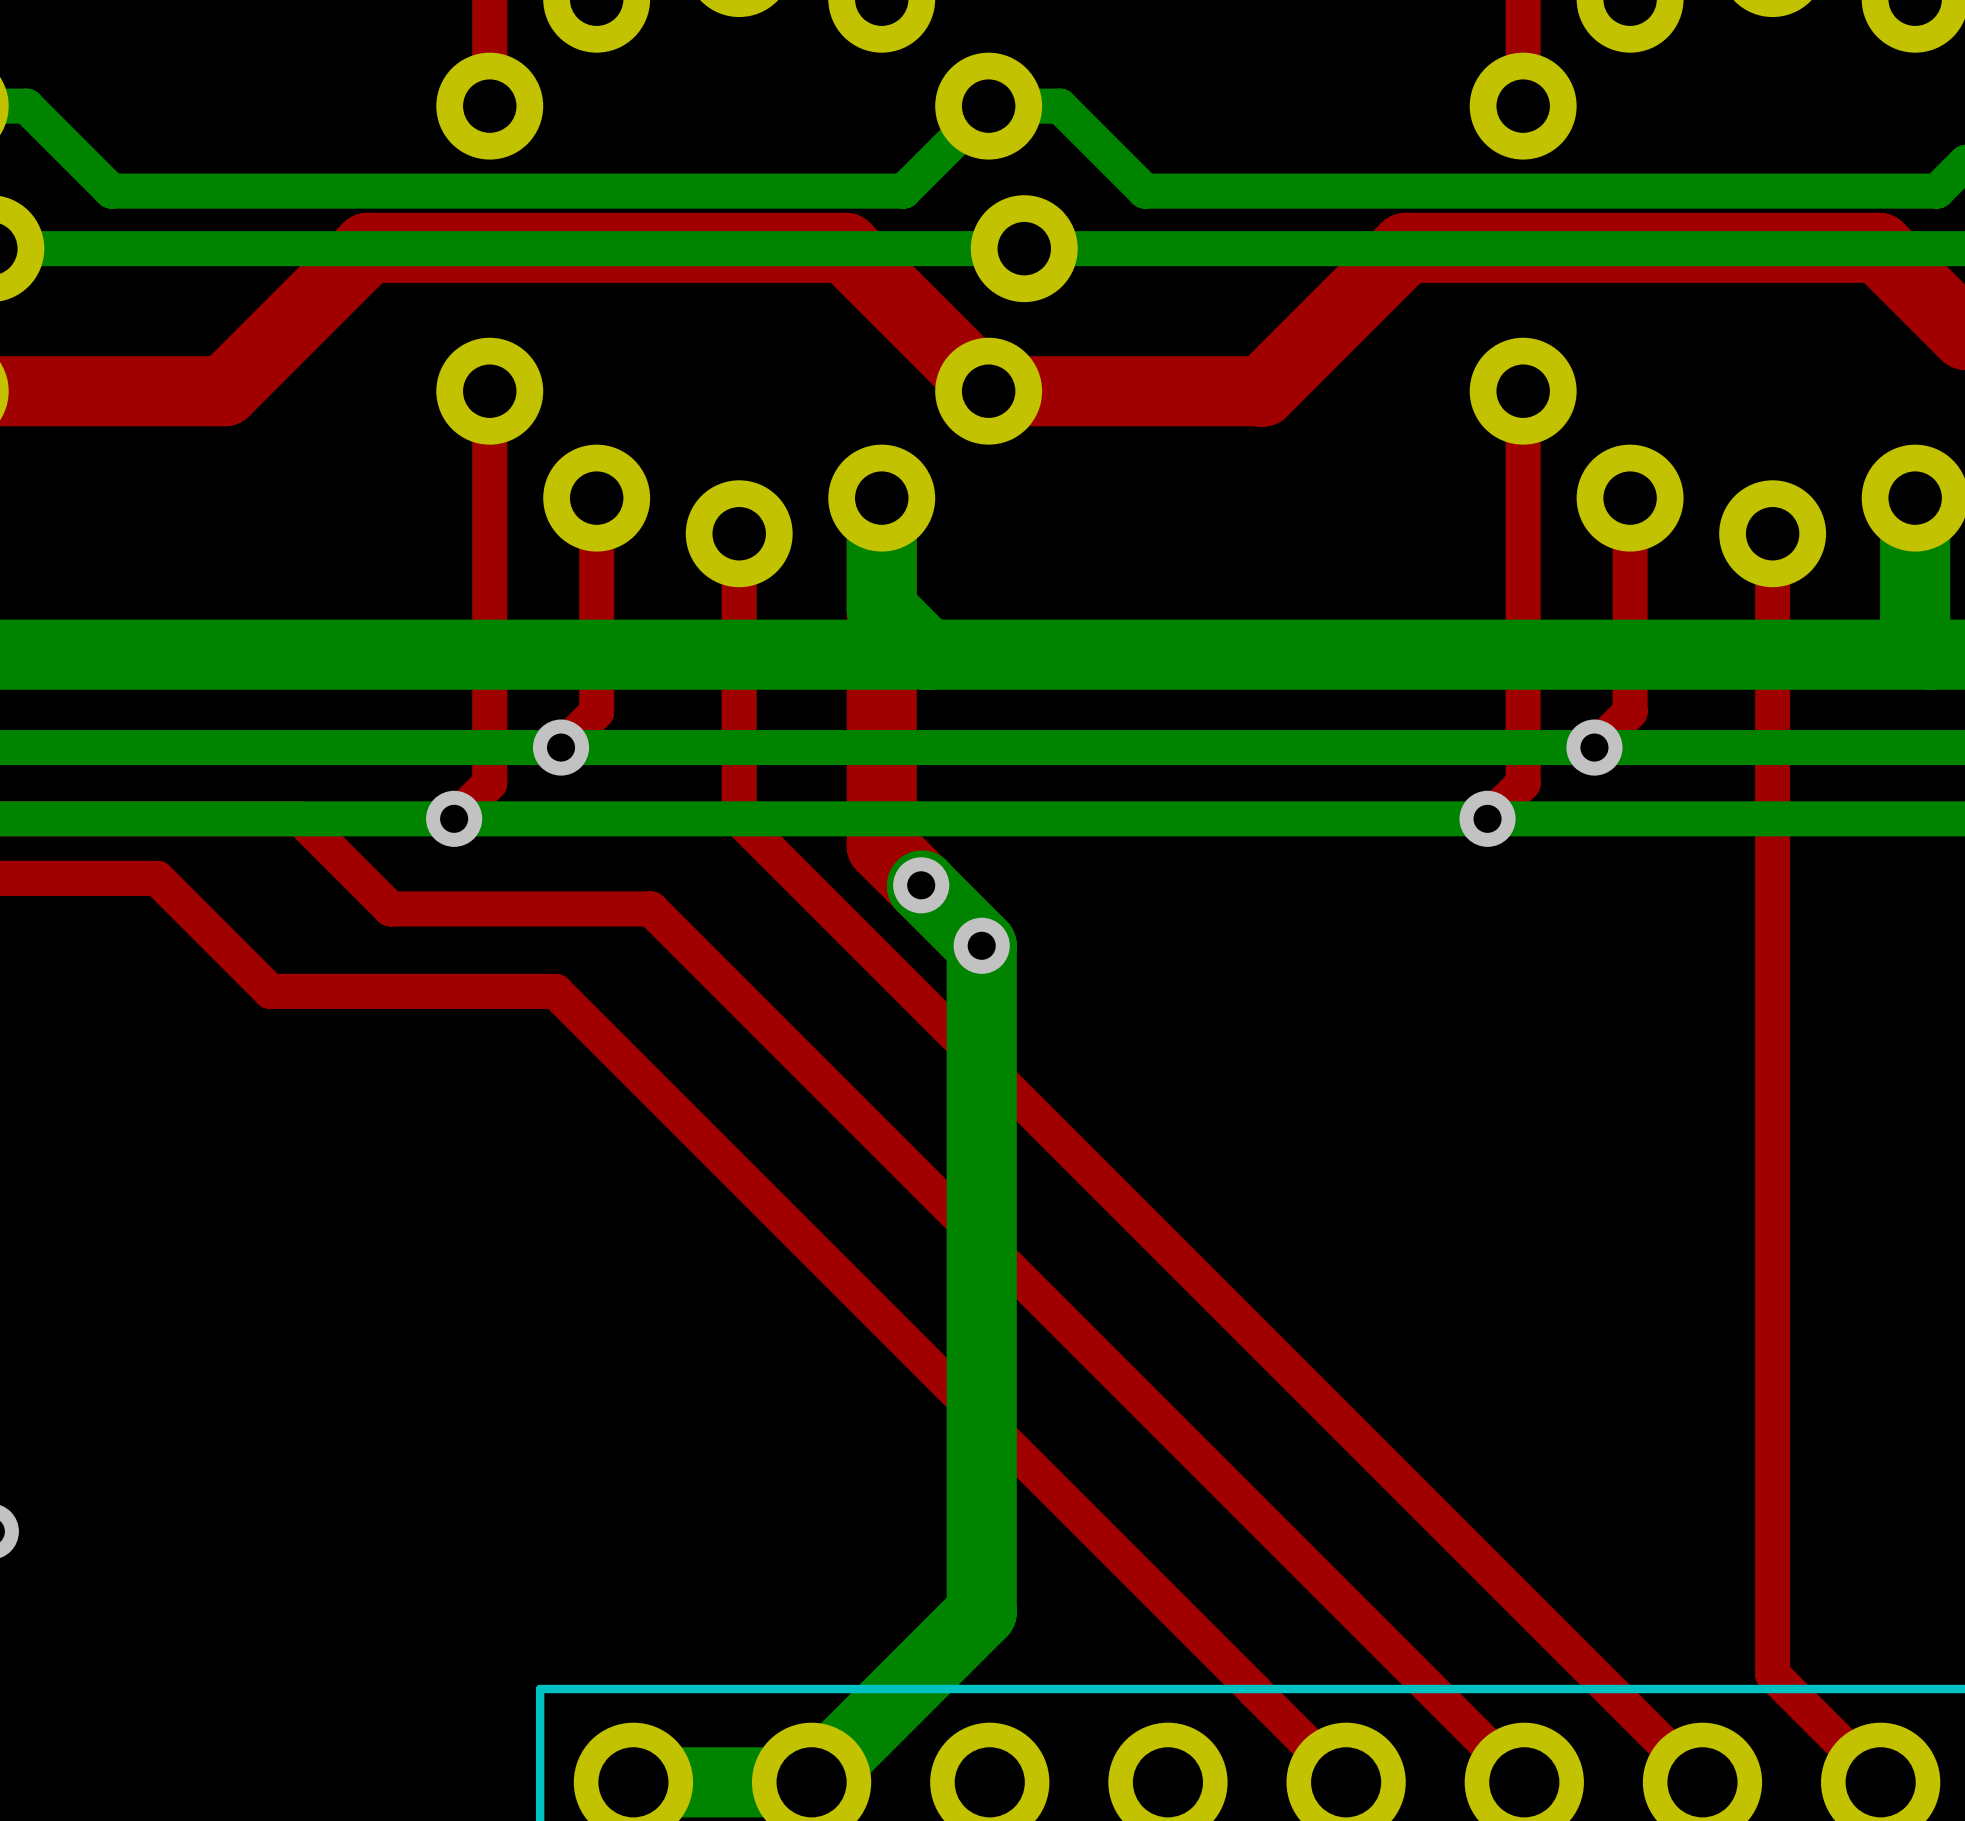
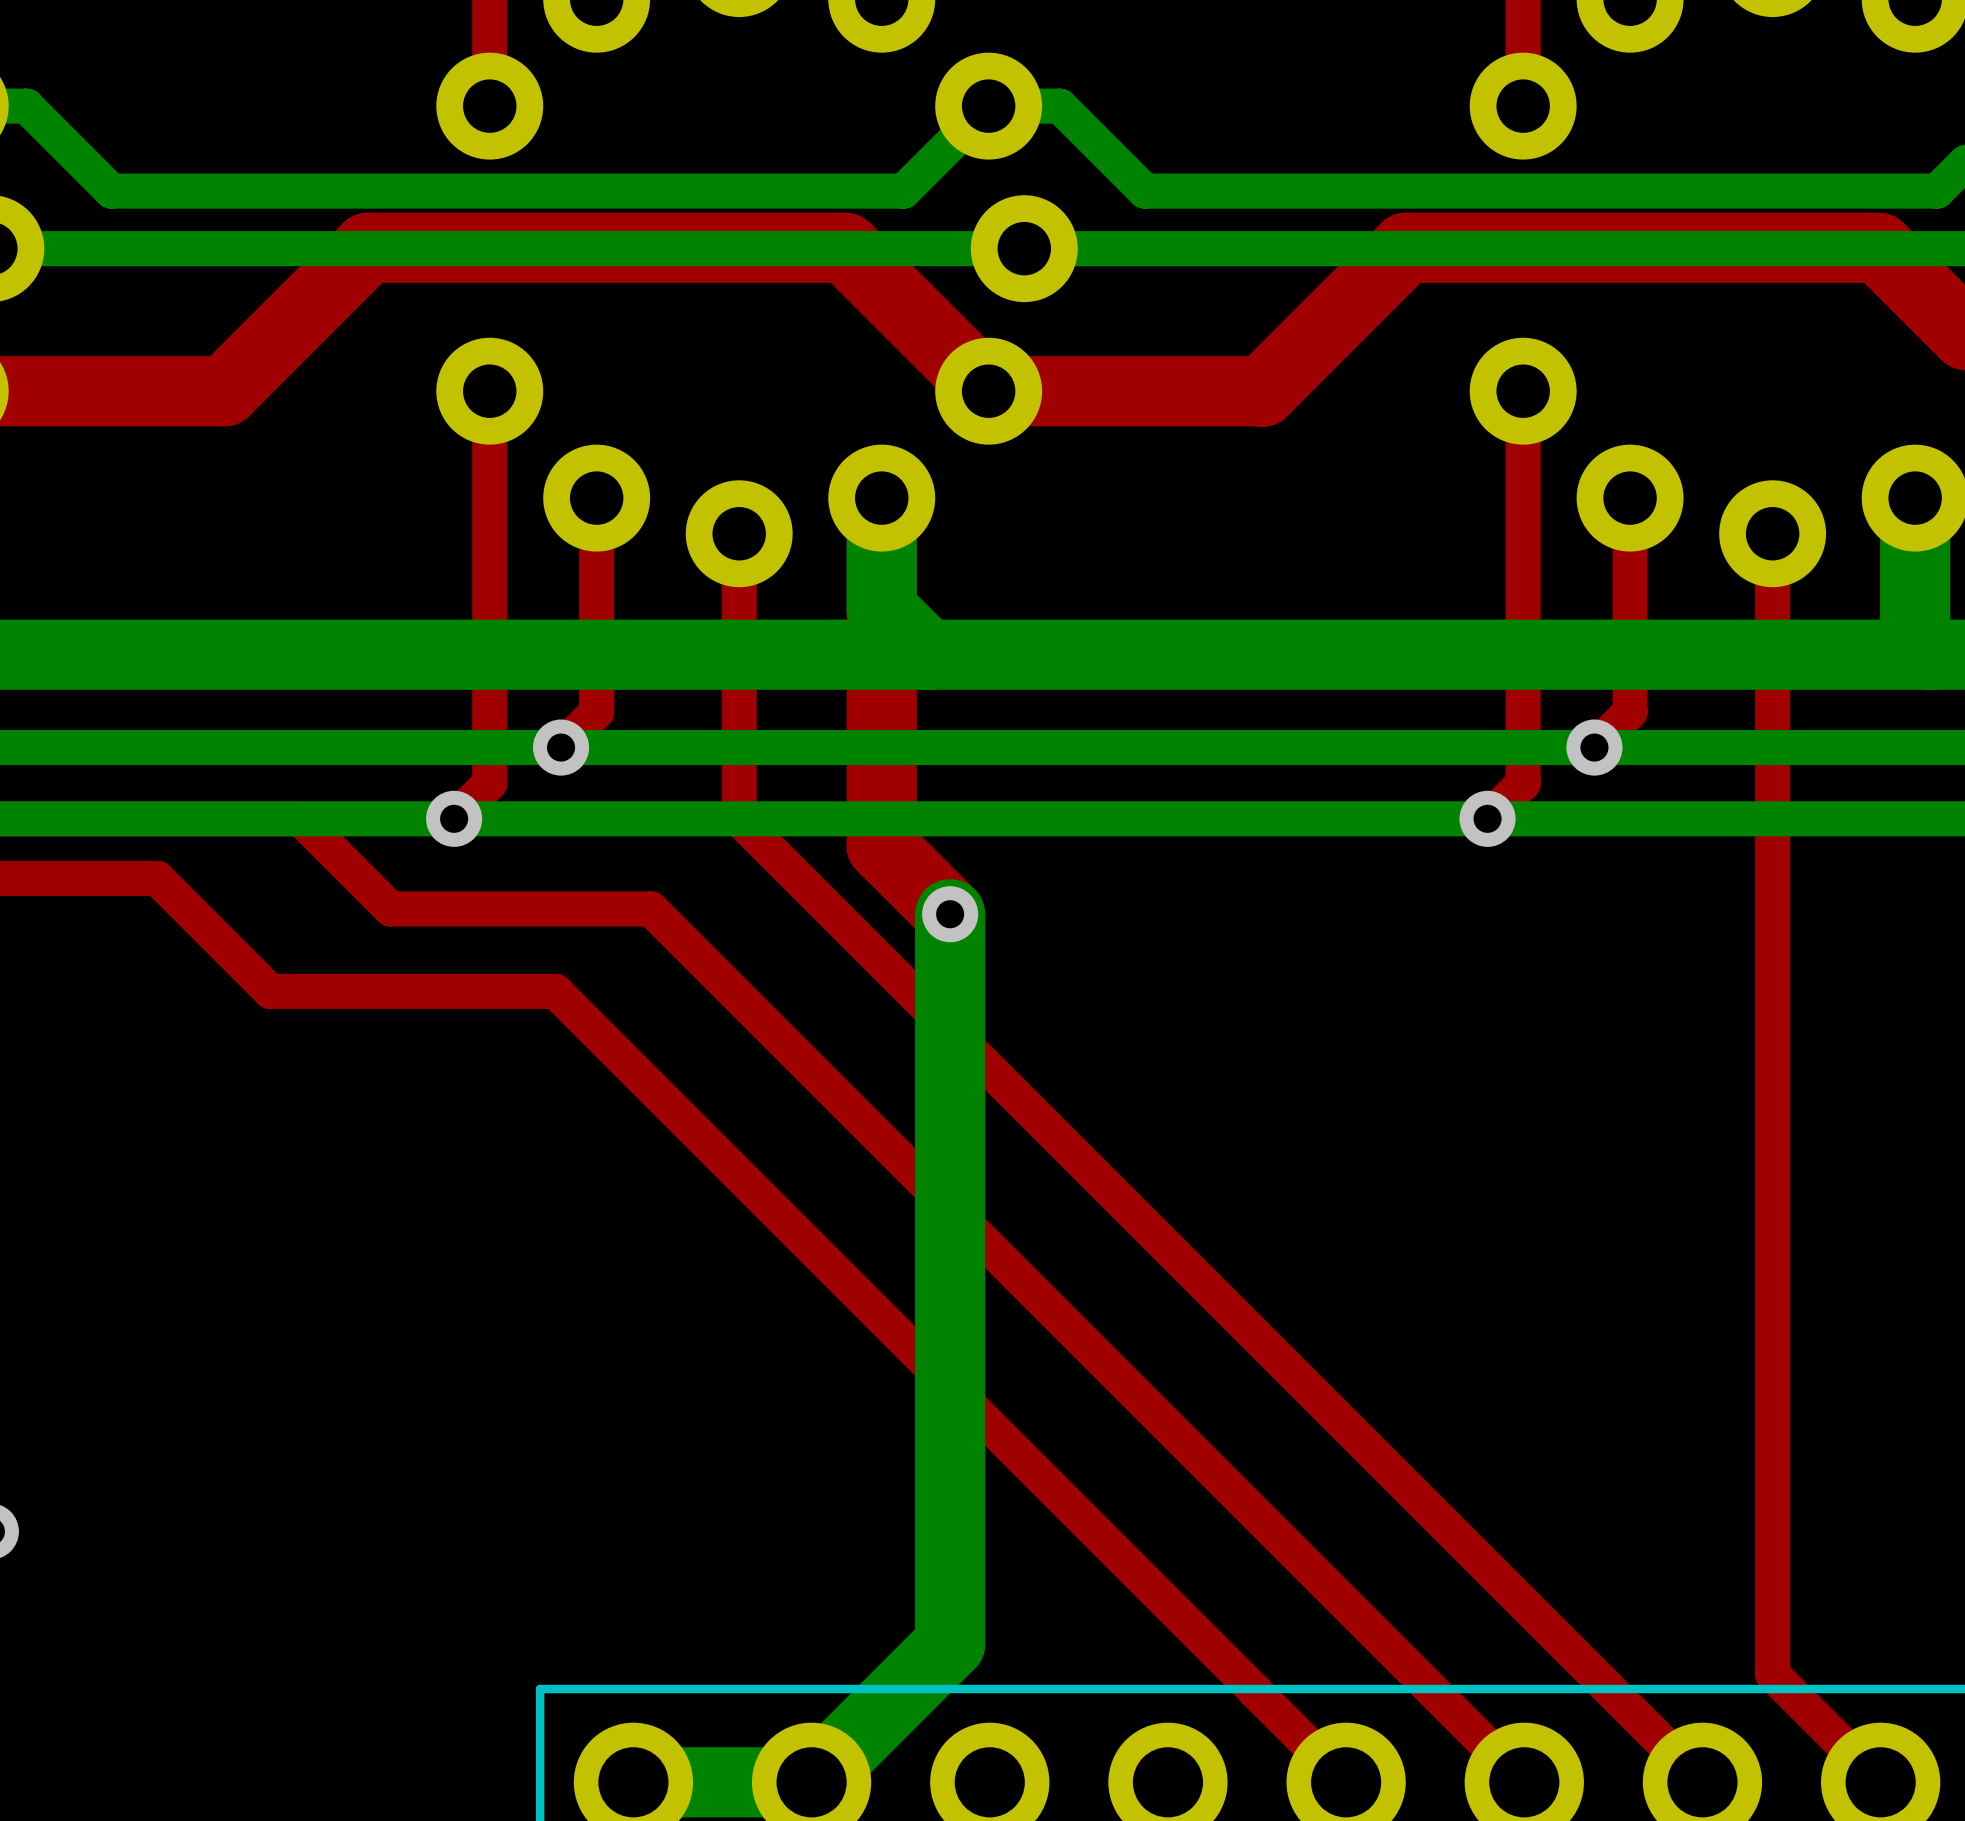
via: (921, 885) -> none
bottom track: (922, 886) (981, 945) (981, 1612) (950, 1643) -> (950, 914) (950, 1643)
via: none -> (950, 914)
via: (981, 945) -> none

